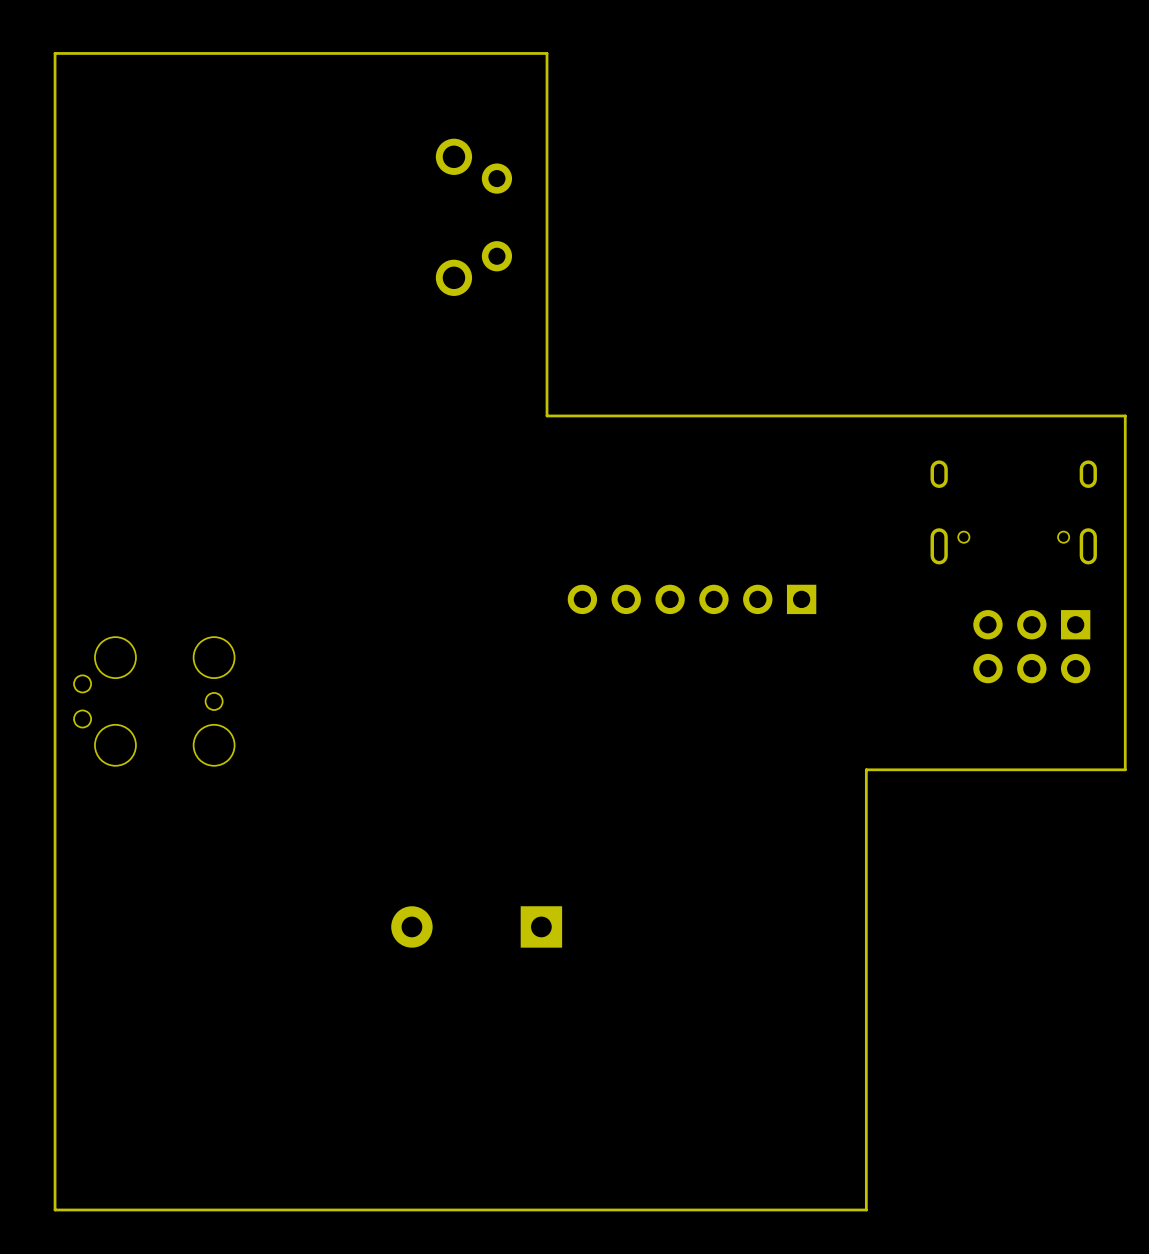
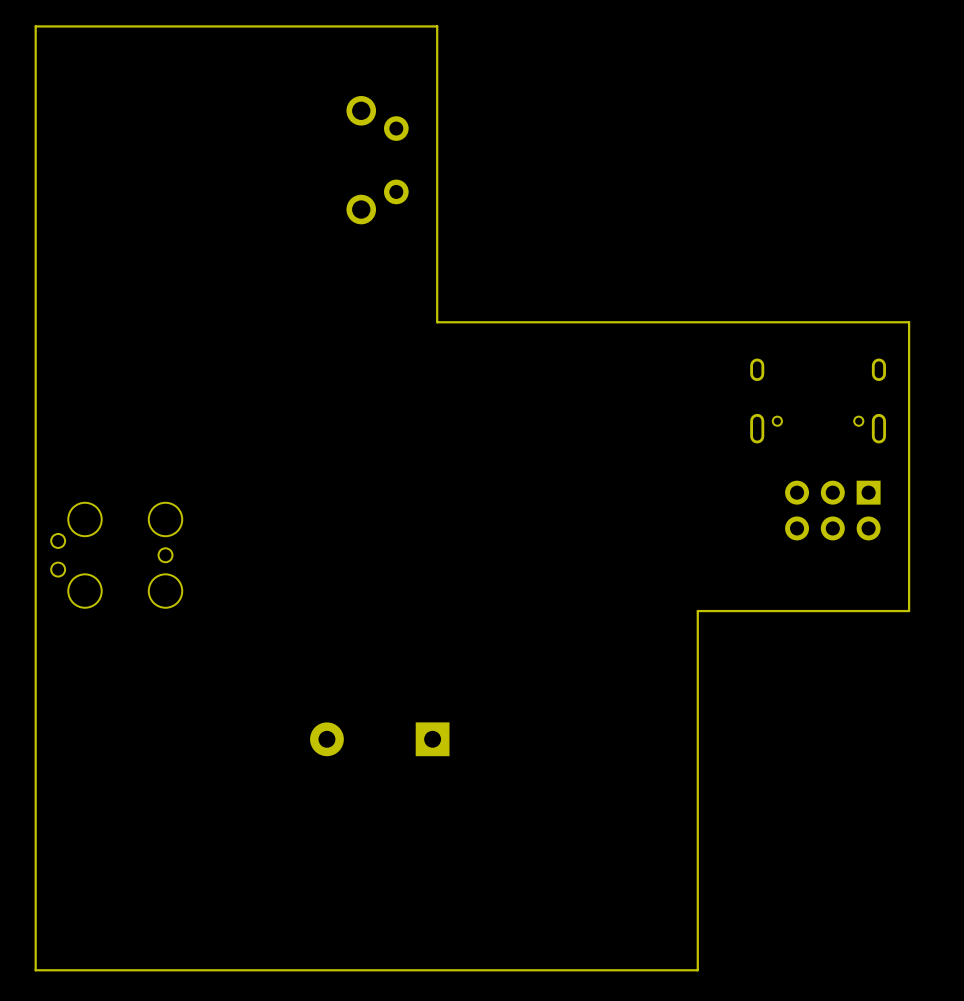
part: (692, 599) -> none

